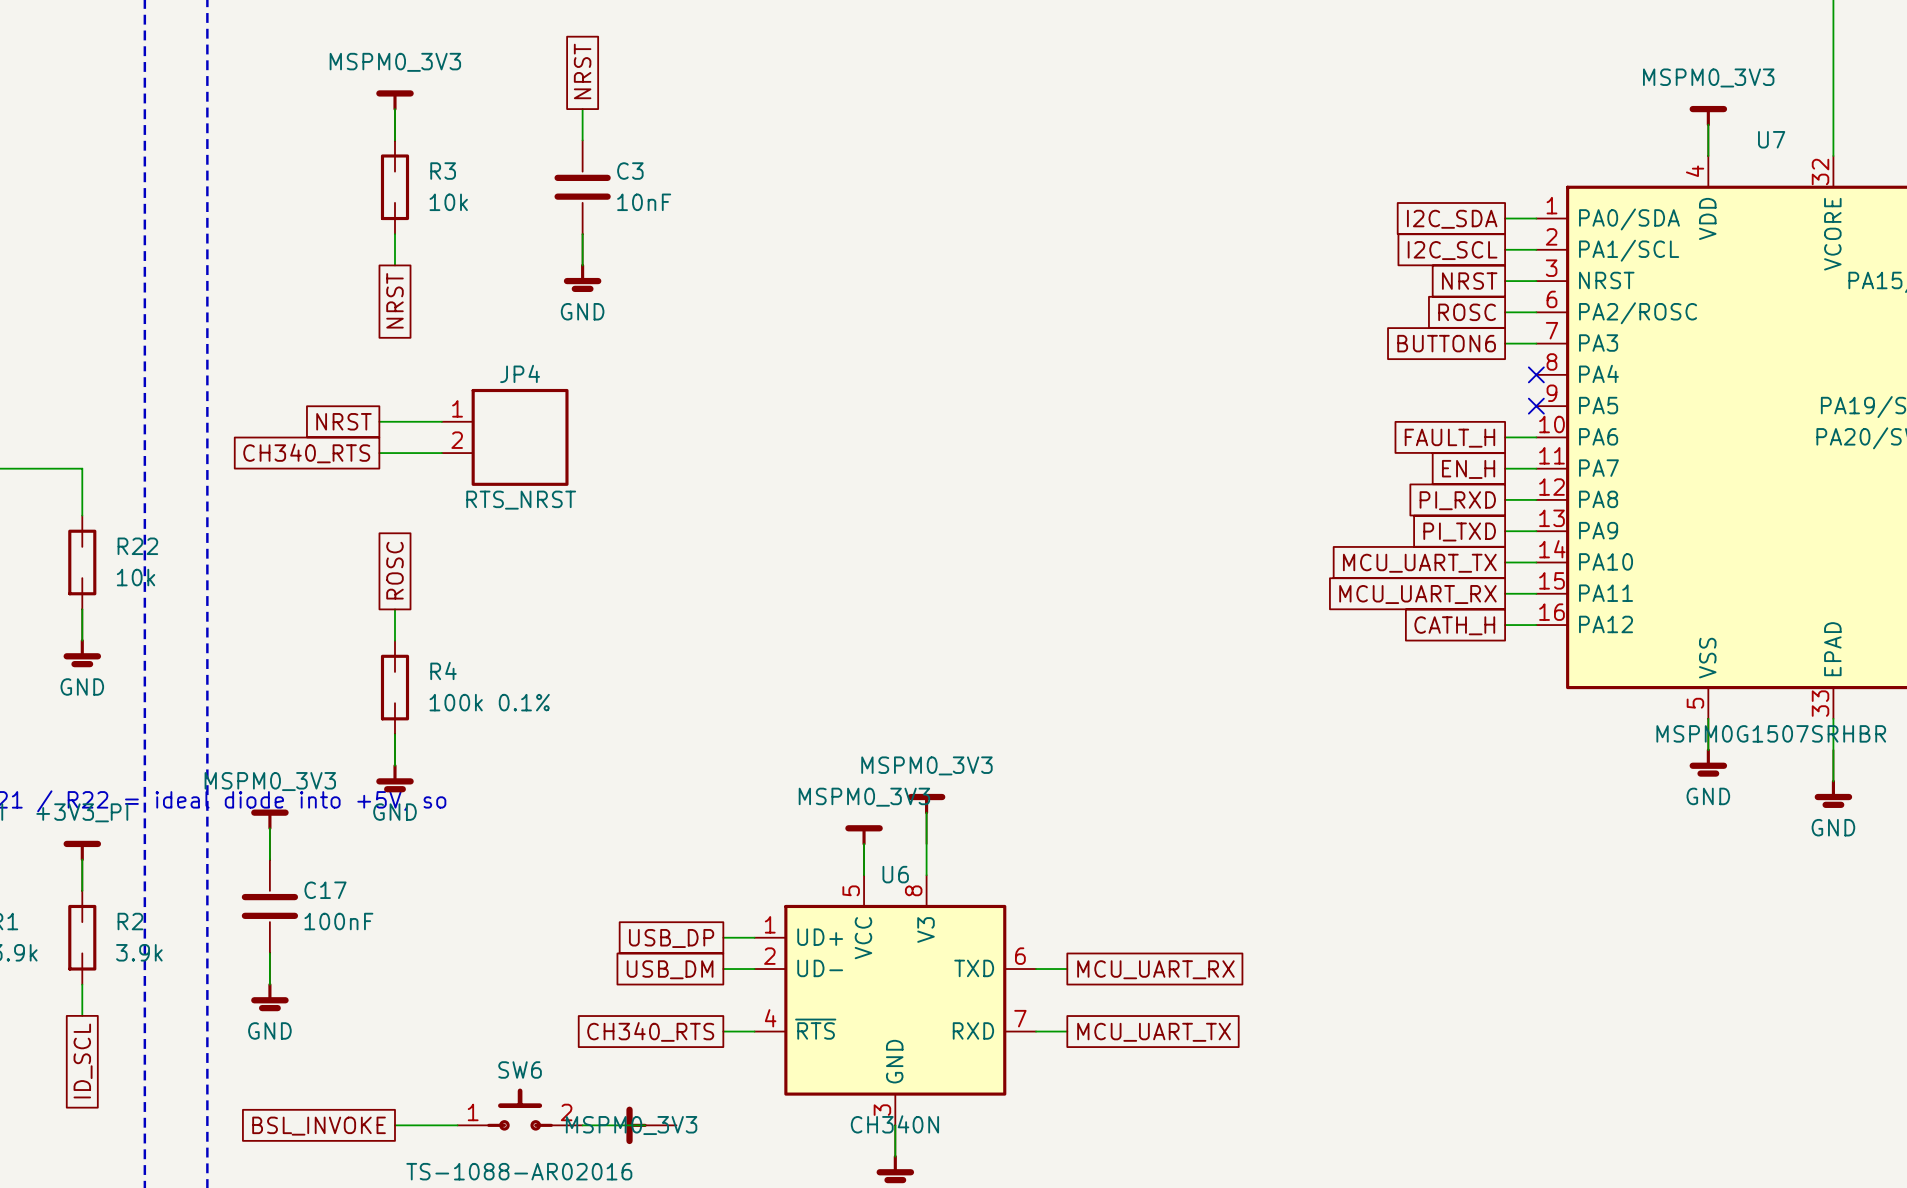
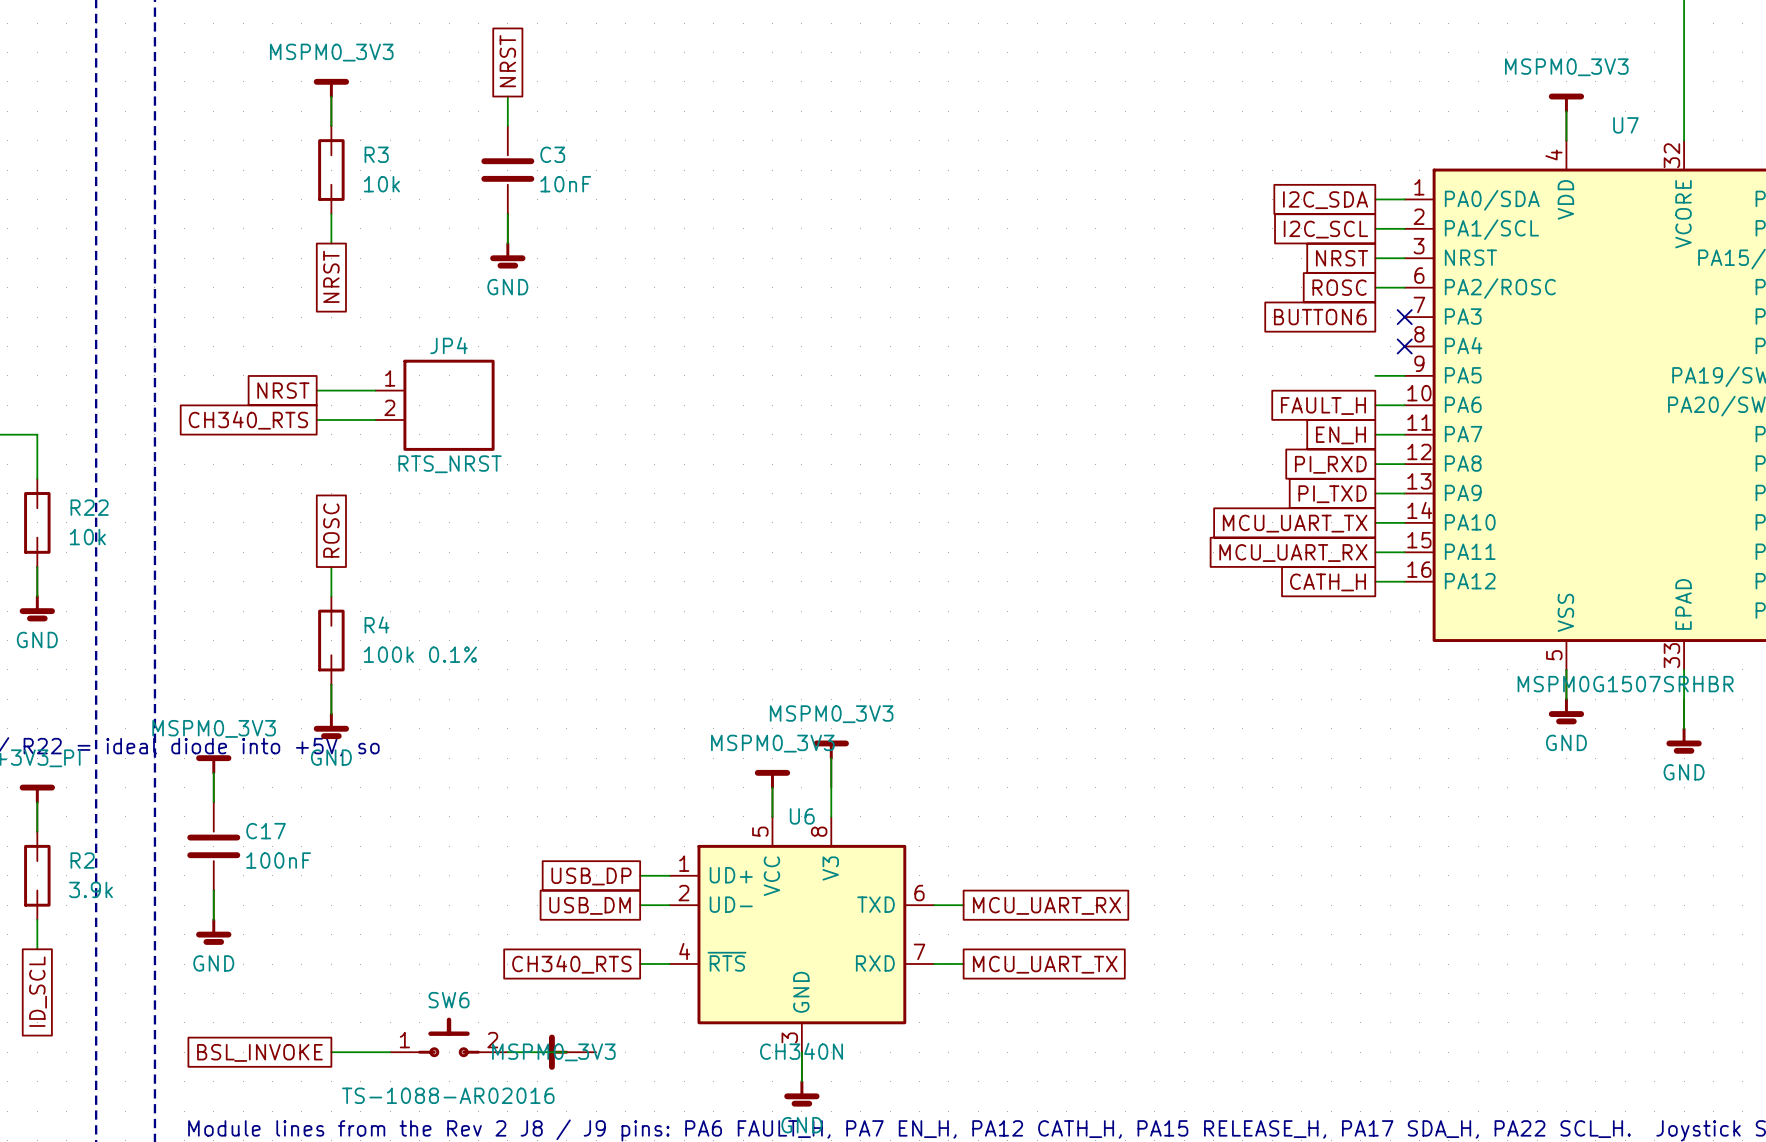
wire: (1505, 343) (1536, 343) -> (1375, 375) (1404, 375)
no-connect mark position: (1536, 406) -> (1404, 317)

